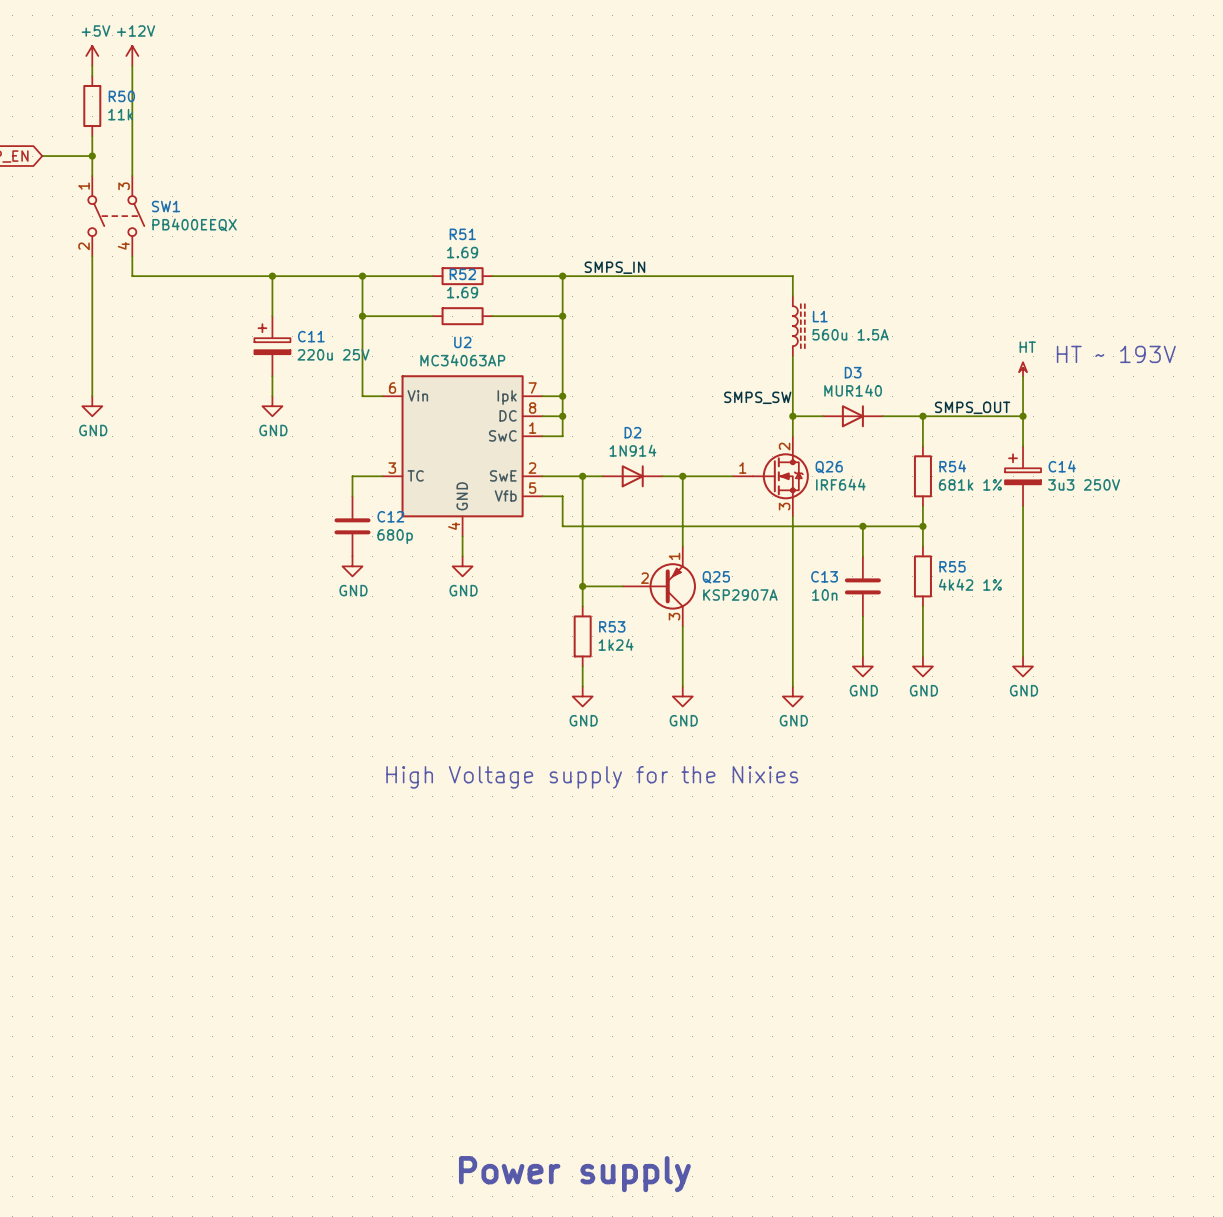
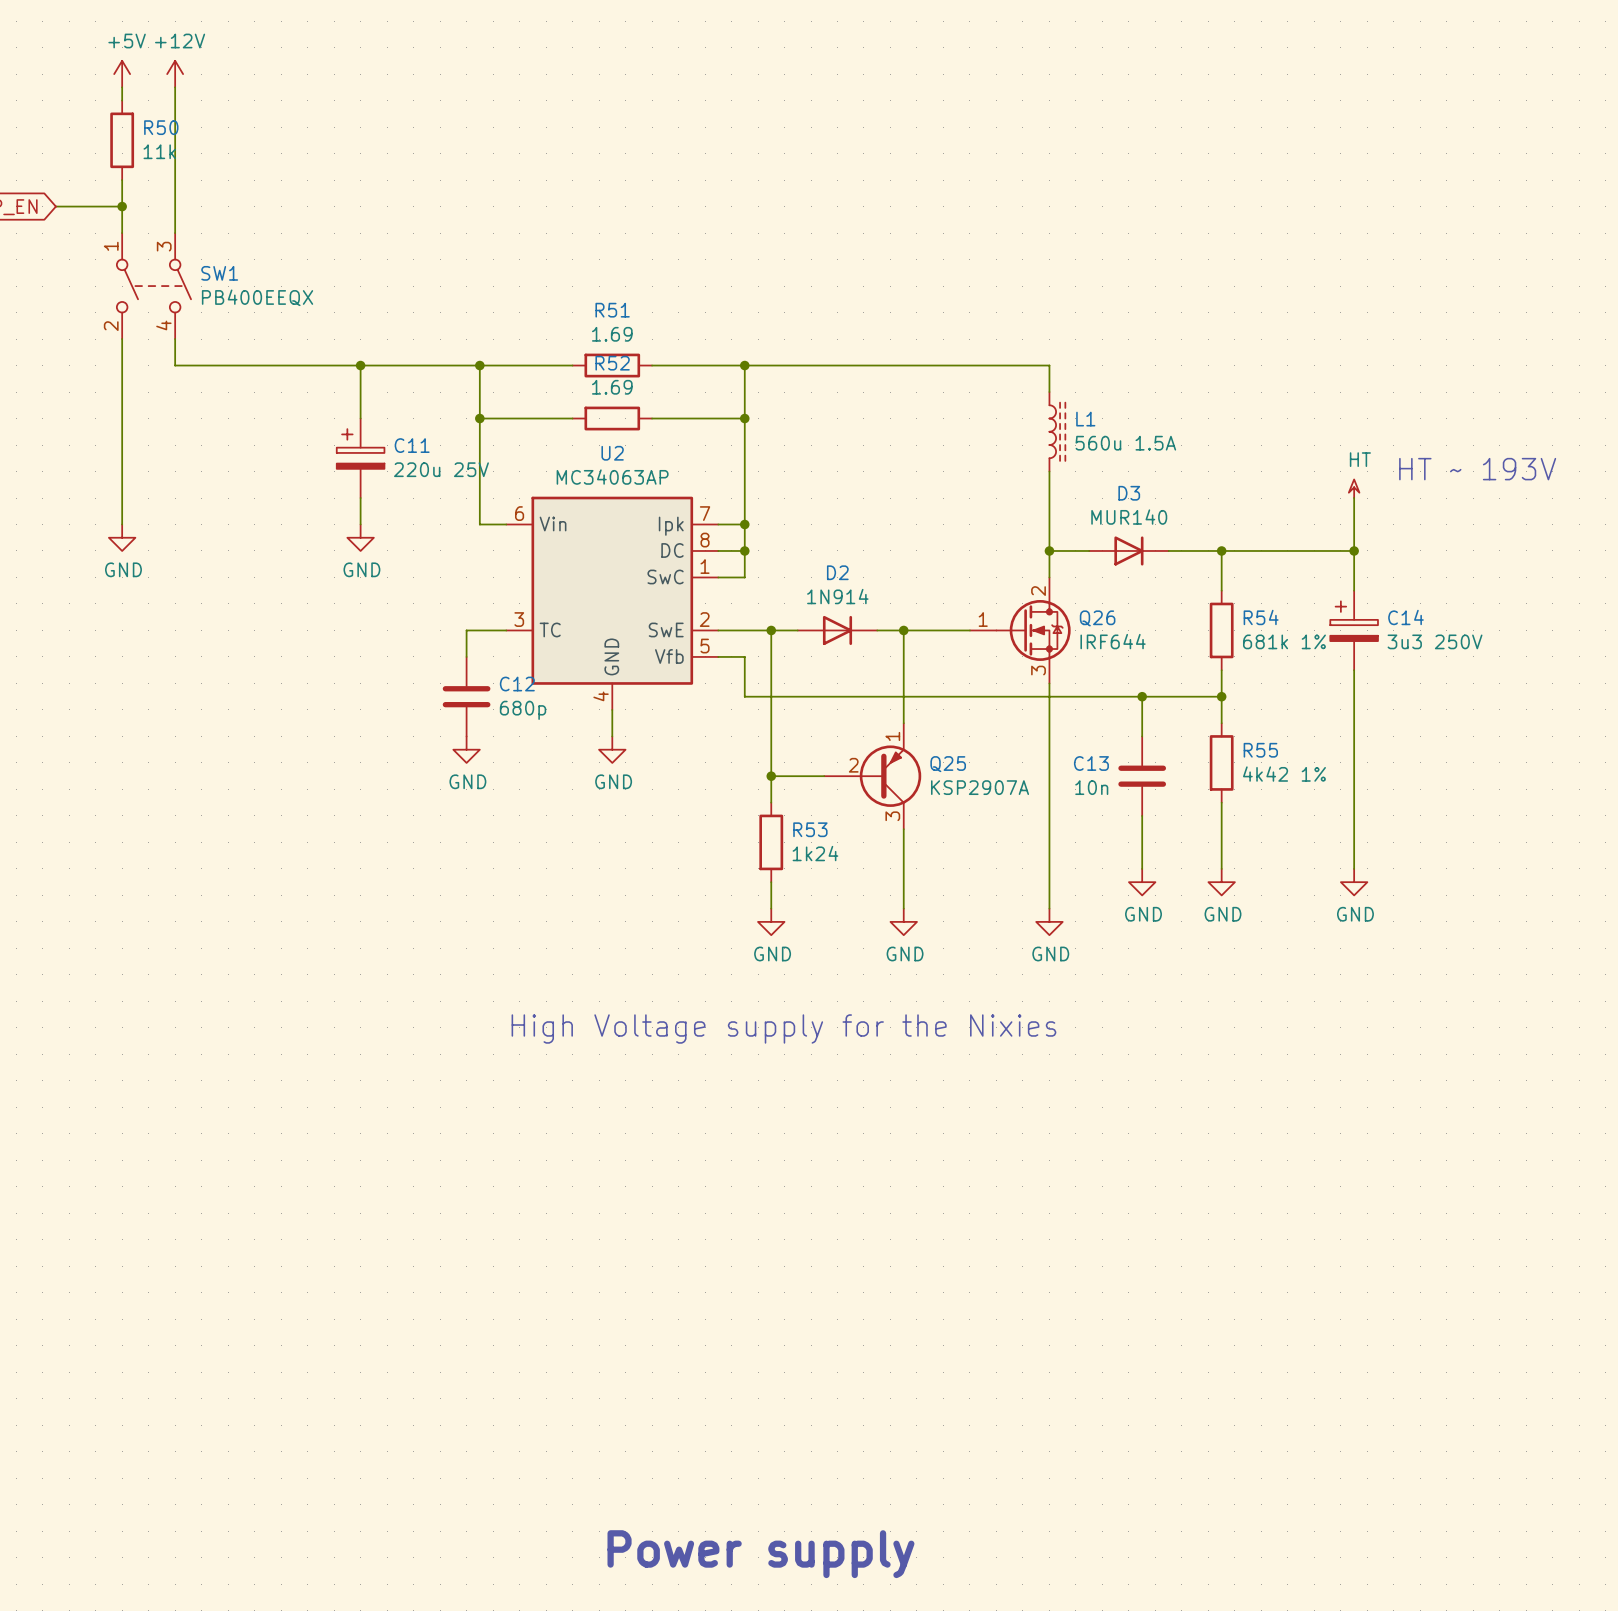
label: SMPS_IN (614, 267) -> none
label: SMPS_SW (757, 397) -> none
label: SMPS_OUT (972, 407) -> none

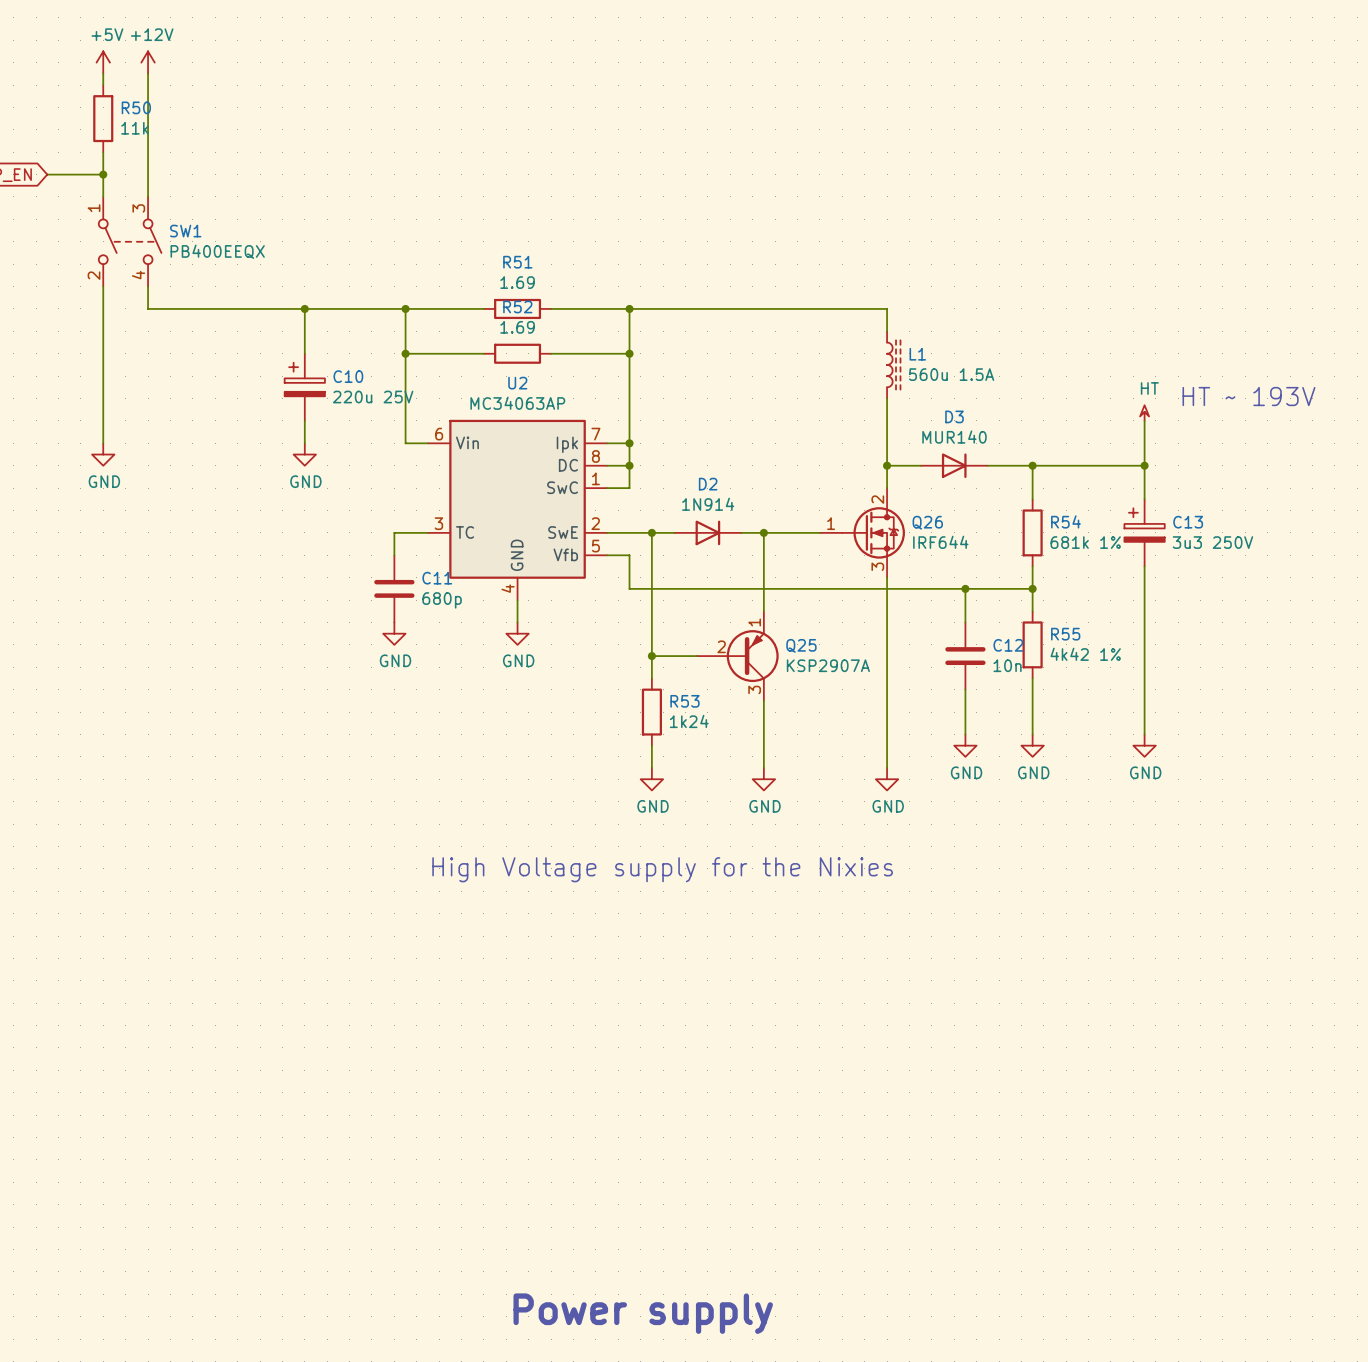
C11 name: C11 (412, 445) -> C10 (348, 376)
C14 name: C14 (1406, 617) -> C13 (1188, 522)
C12 name: C12 (517, 684) -> C11 (437, 578)
C13 name: C13 (1091, 763) -> C12 (1008, 645)
C13 value position: 10n (1091, 787) -> 10n (1007, 665)

